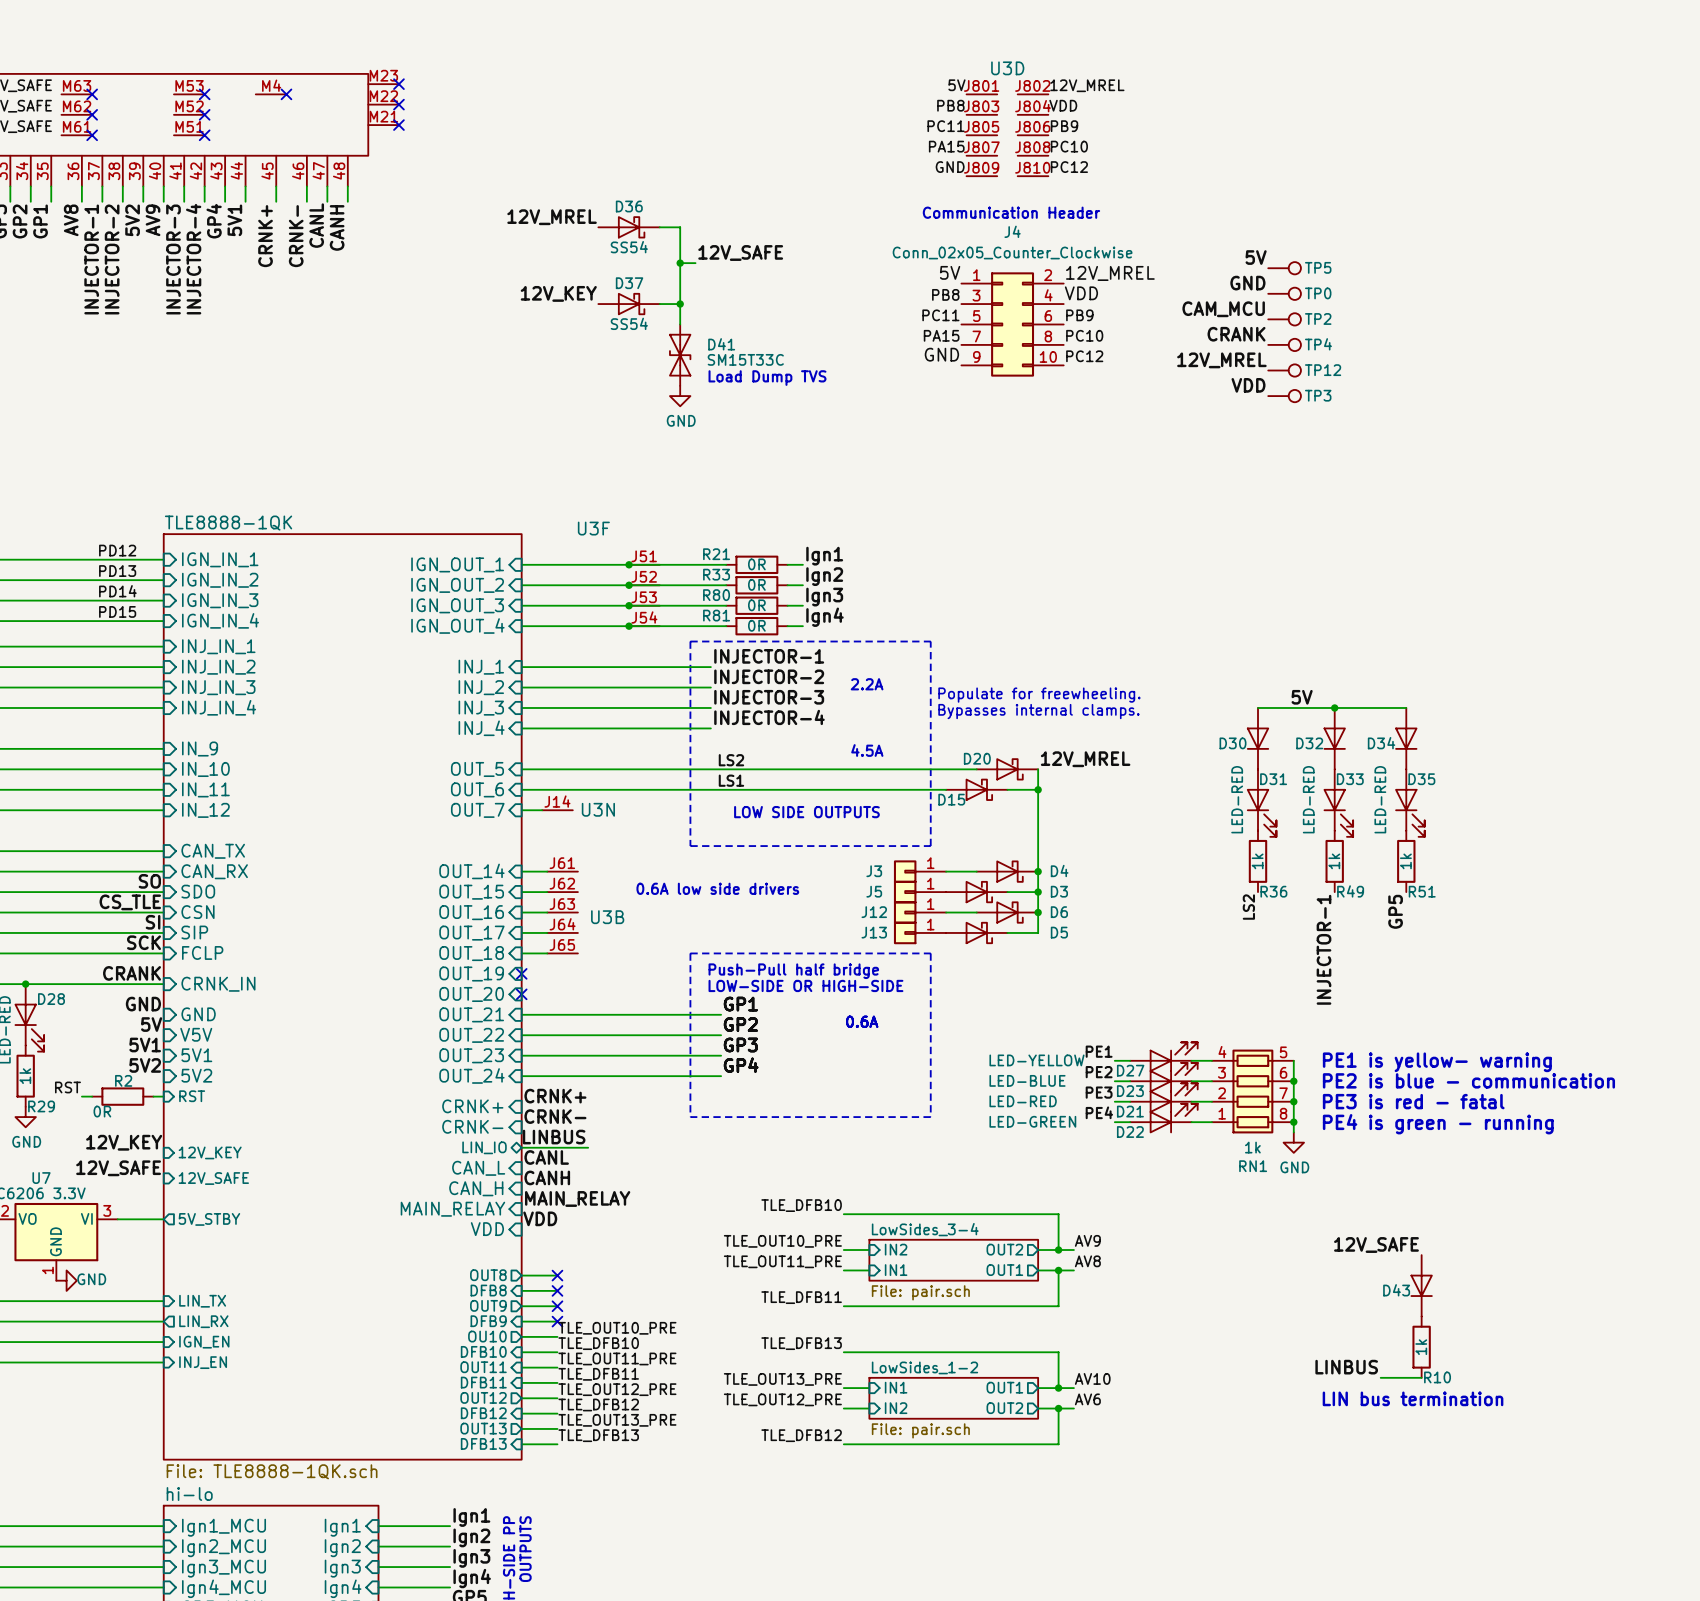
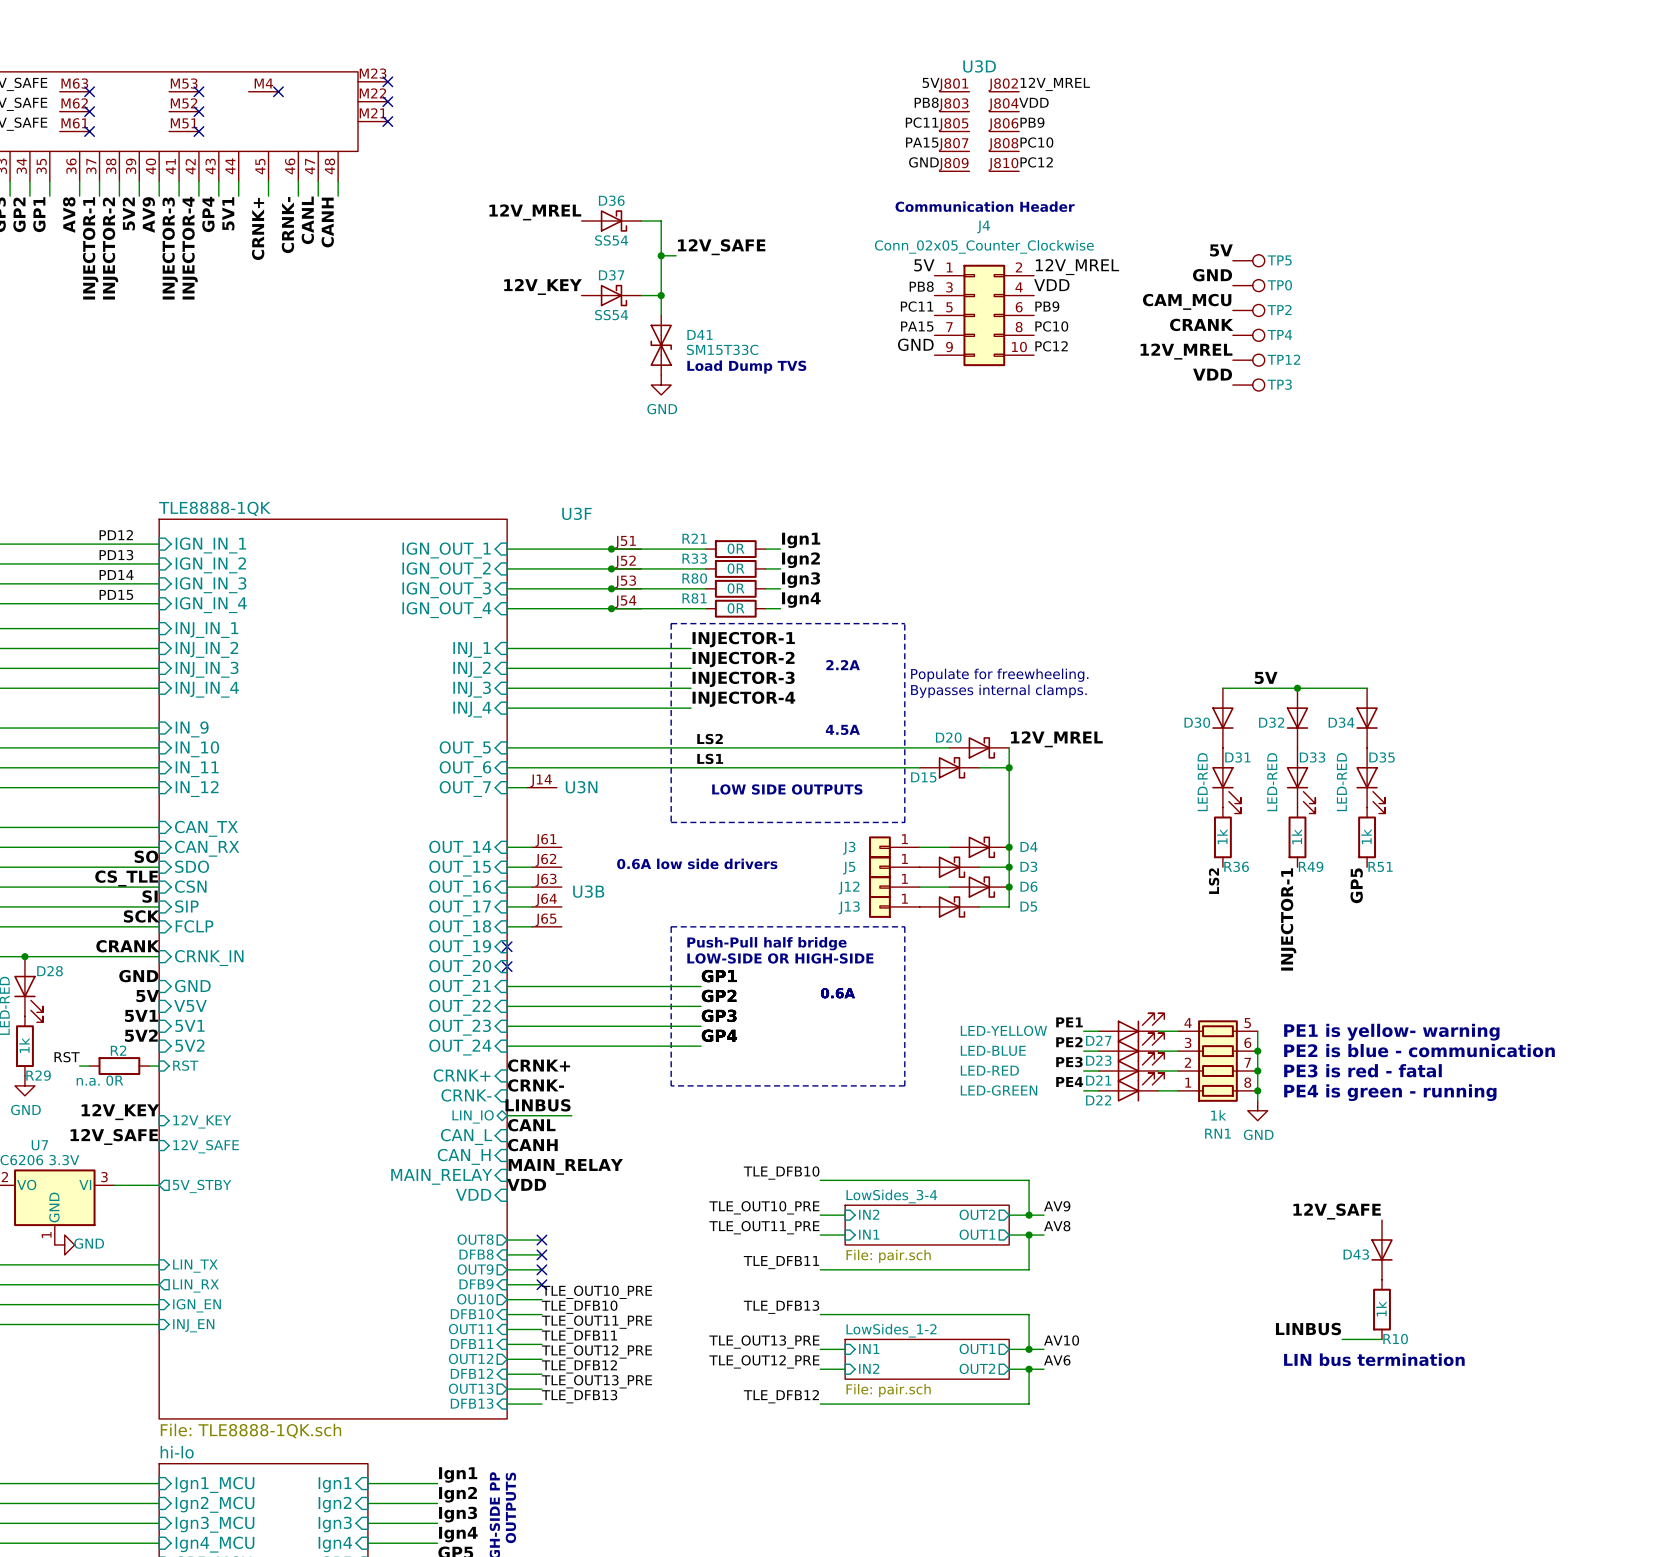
R2 value: 0R (102, 1111) -> n.a. 0R (99, 1080)

